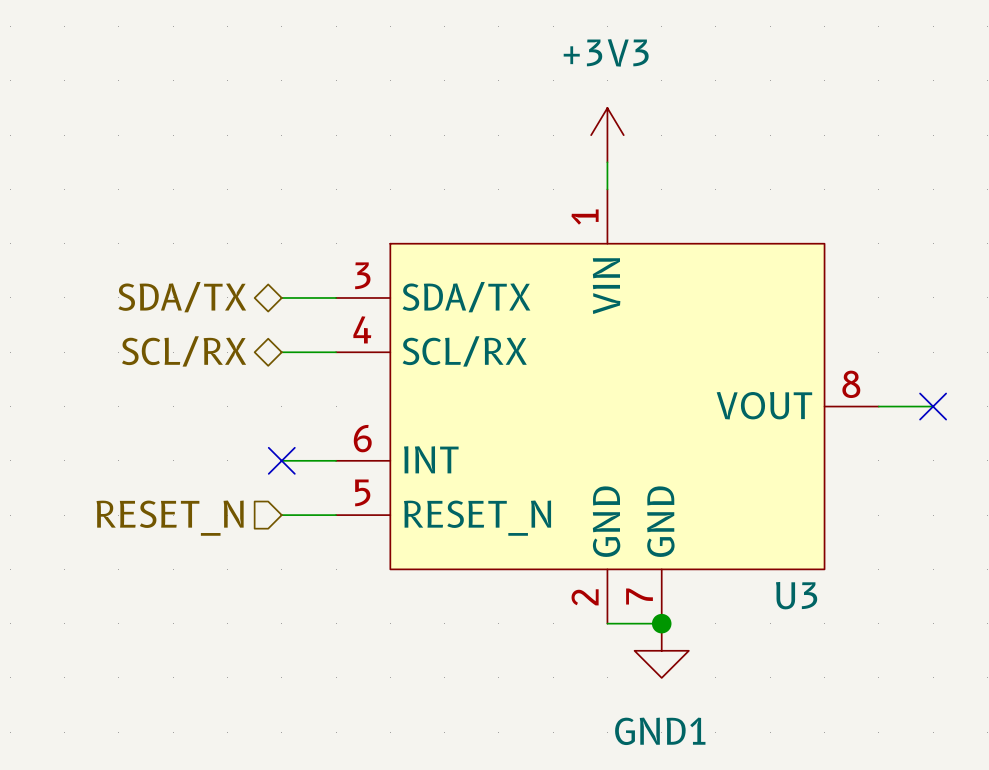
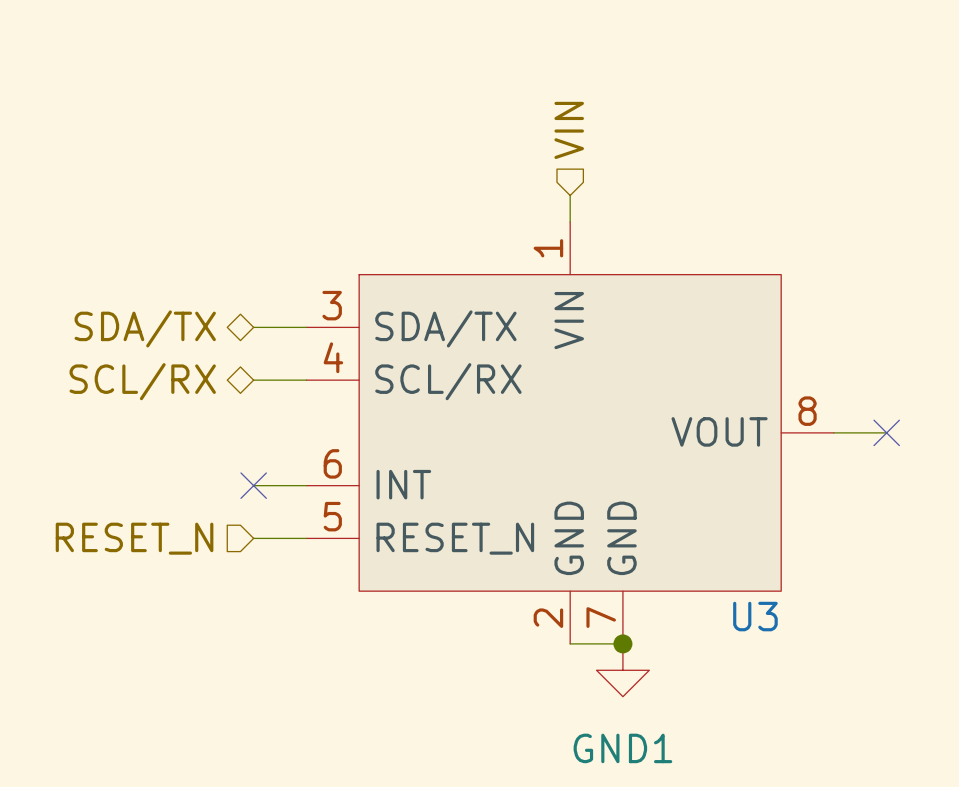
hierarchical label: none -> VIN (569, 130)
power symbol: +3V3 (607, 135) -> none

